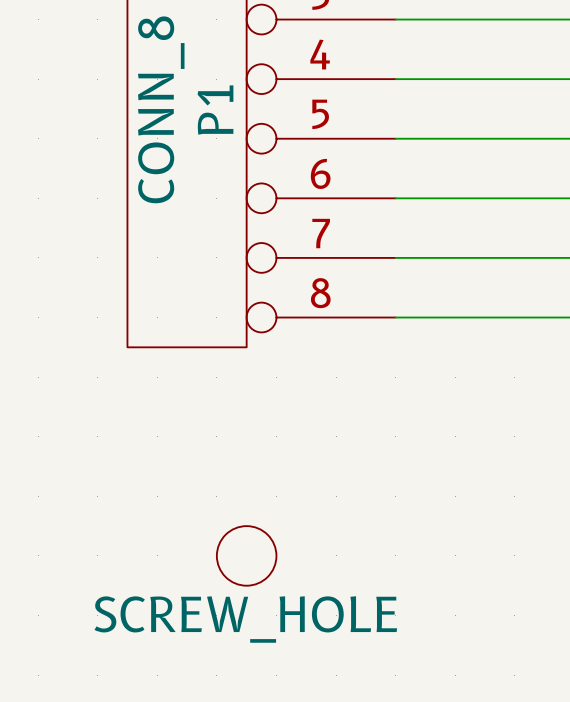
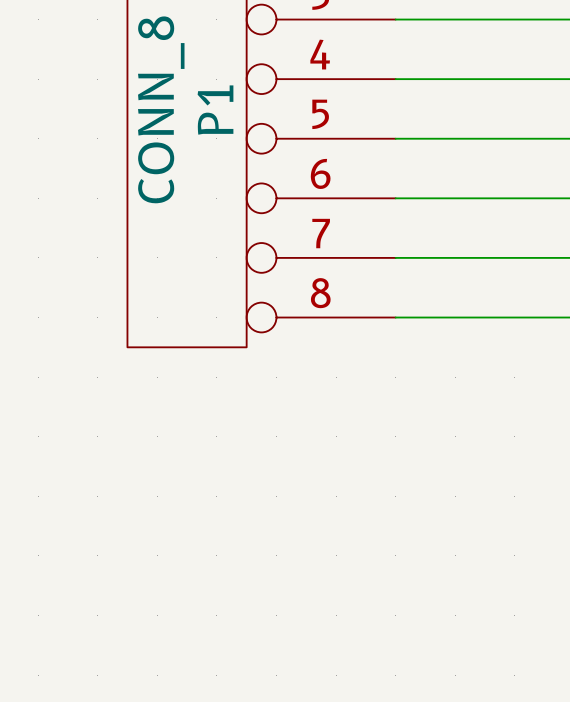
part: SCREW_HOLE (246, 555) -> none

